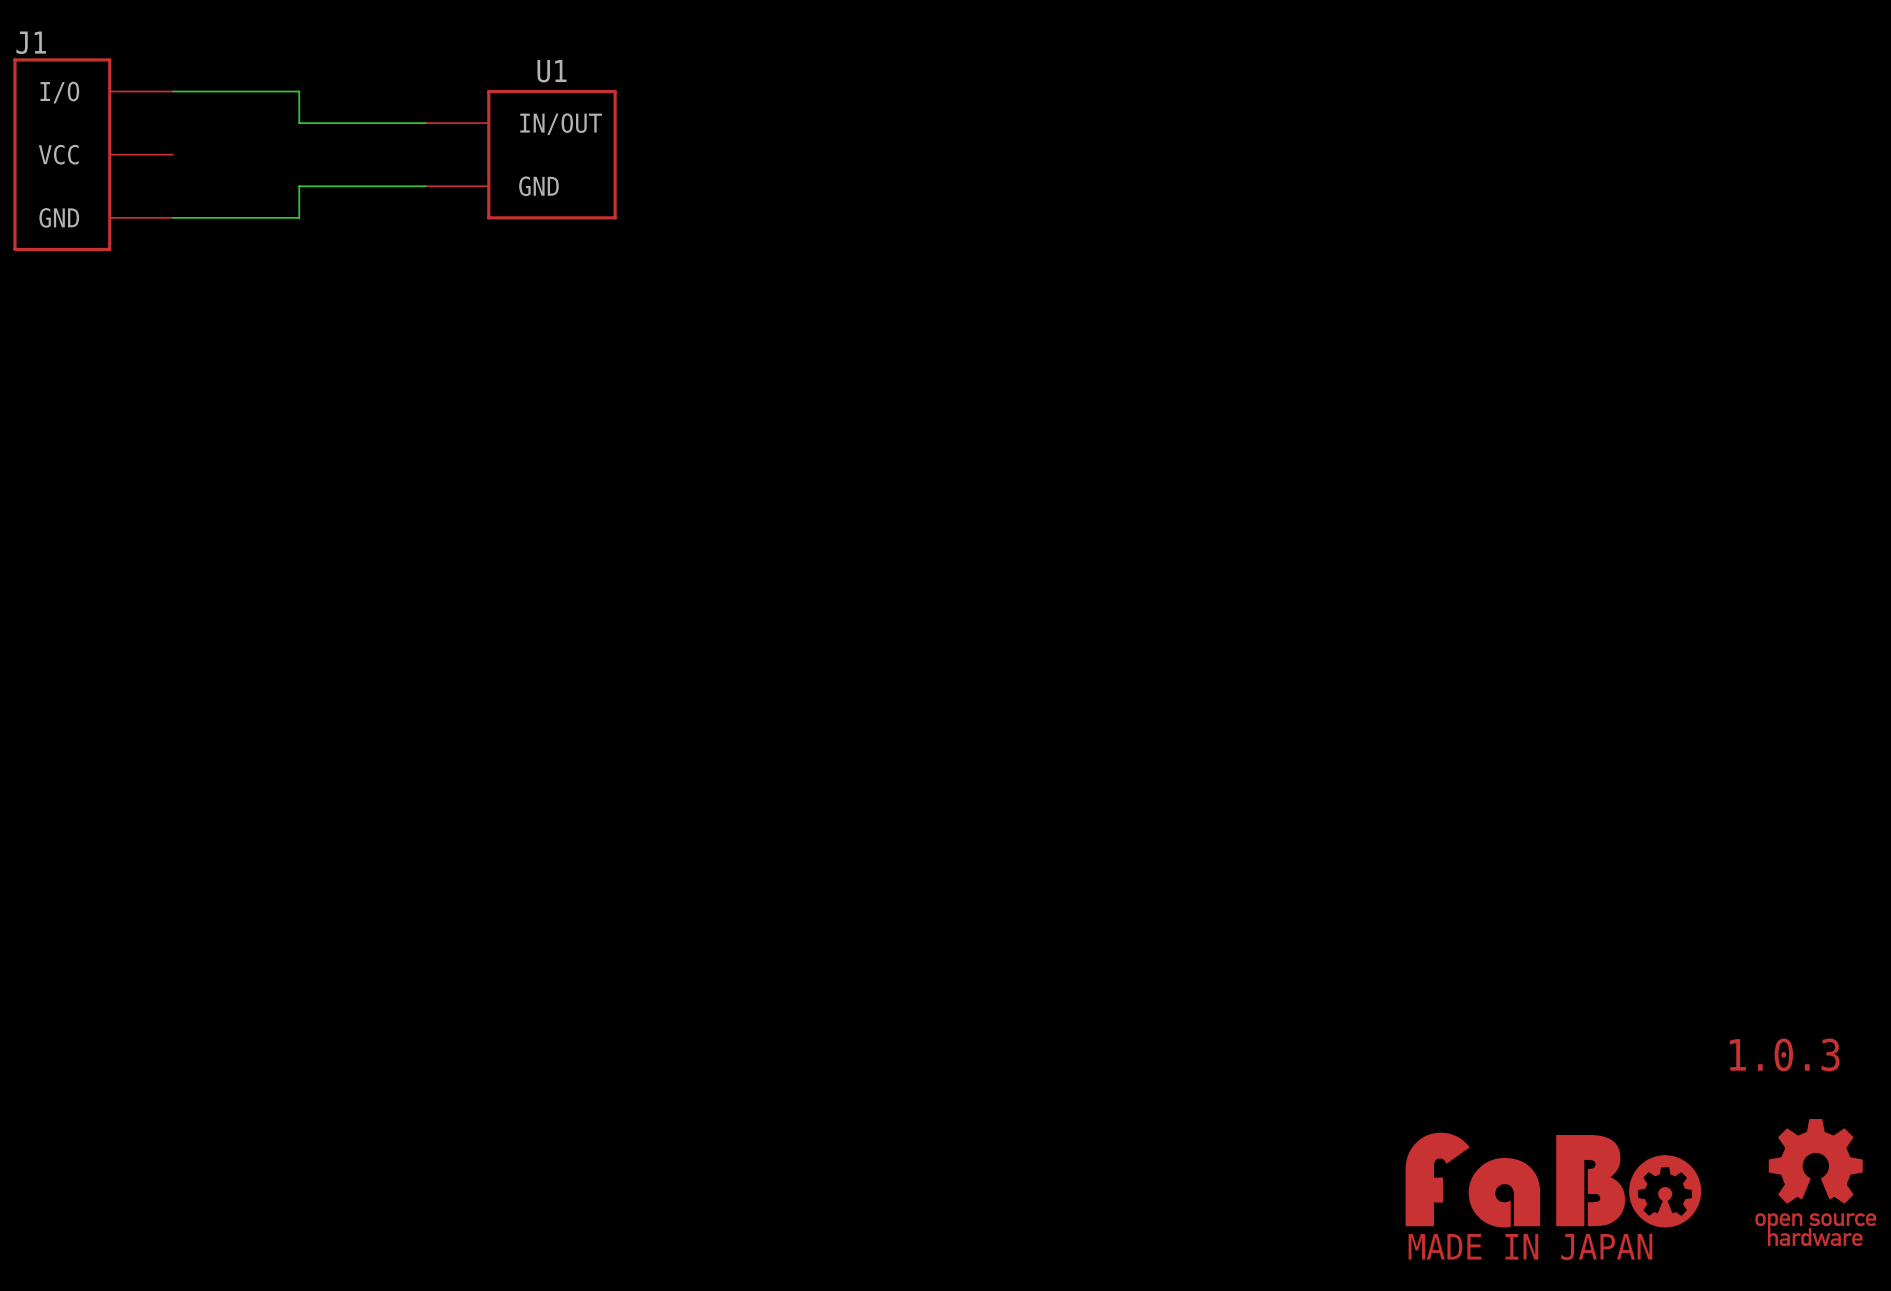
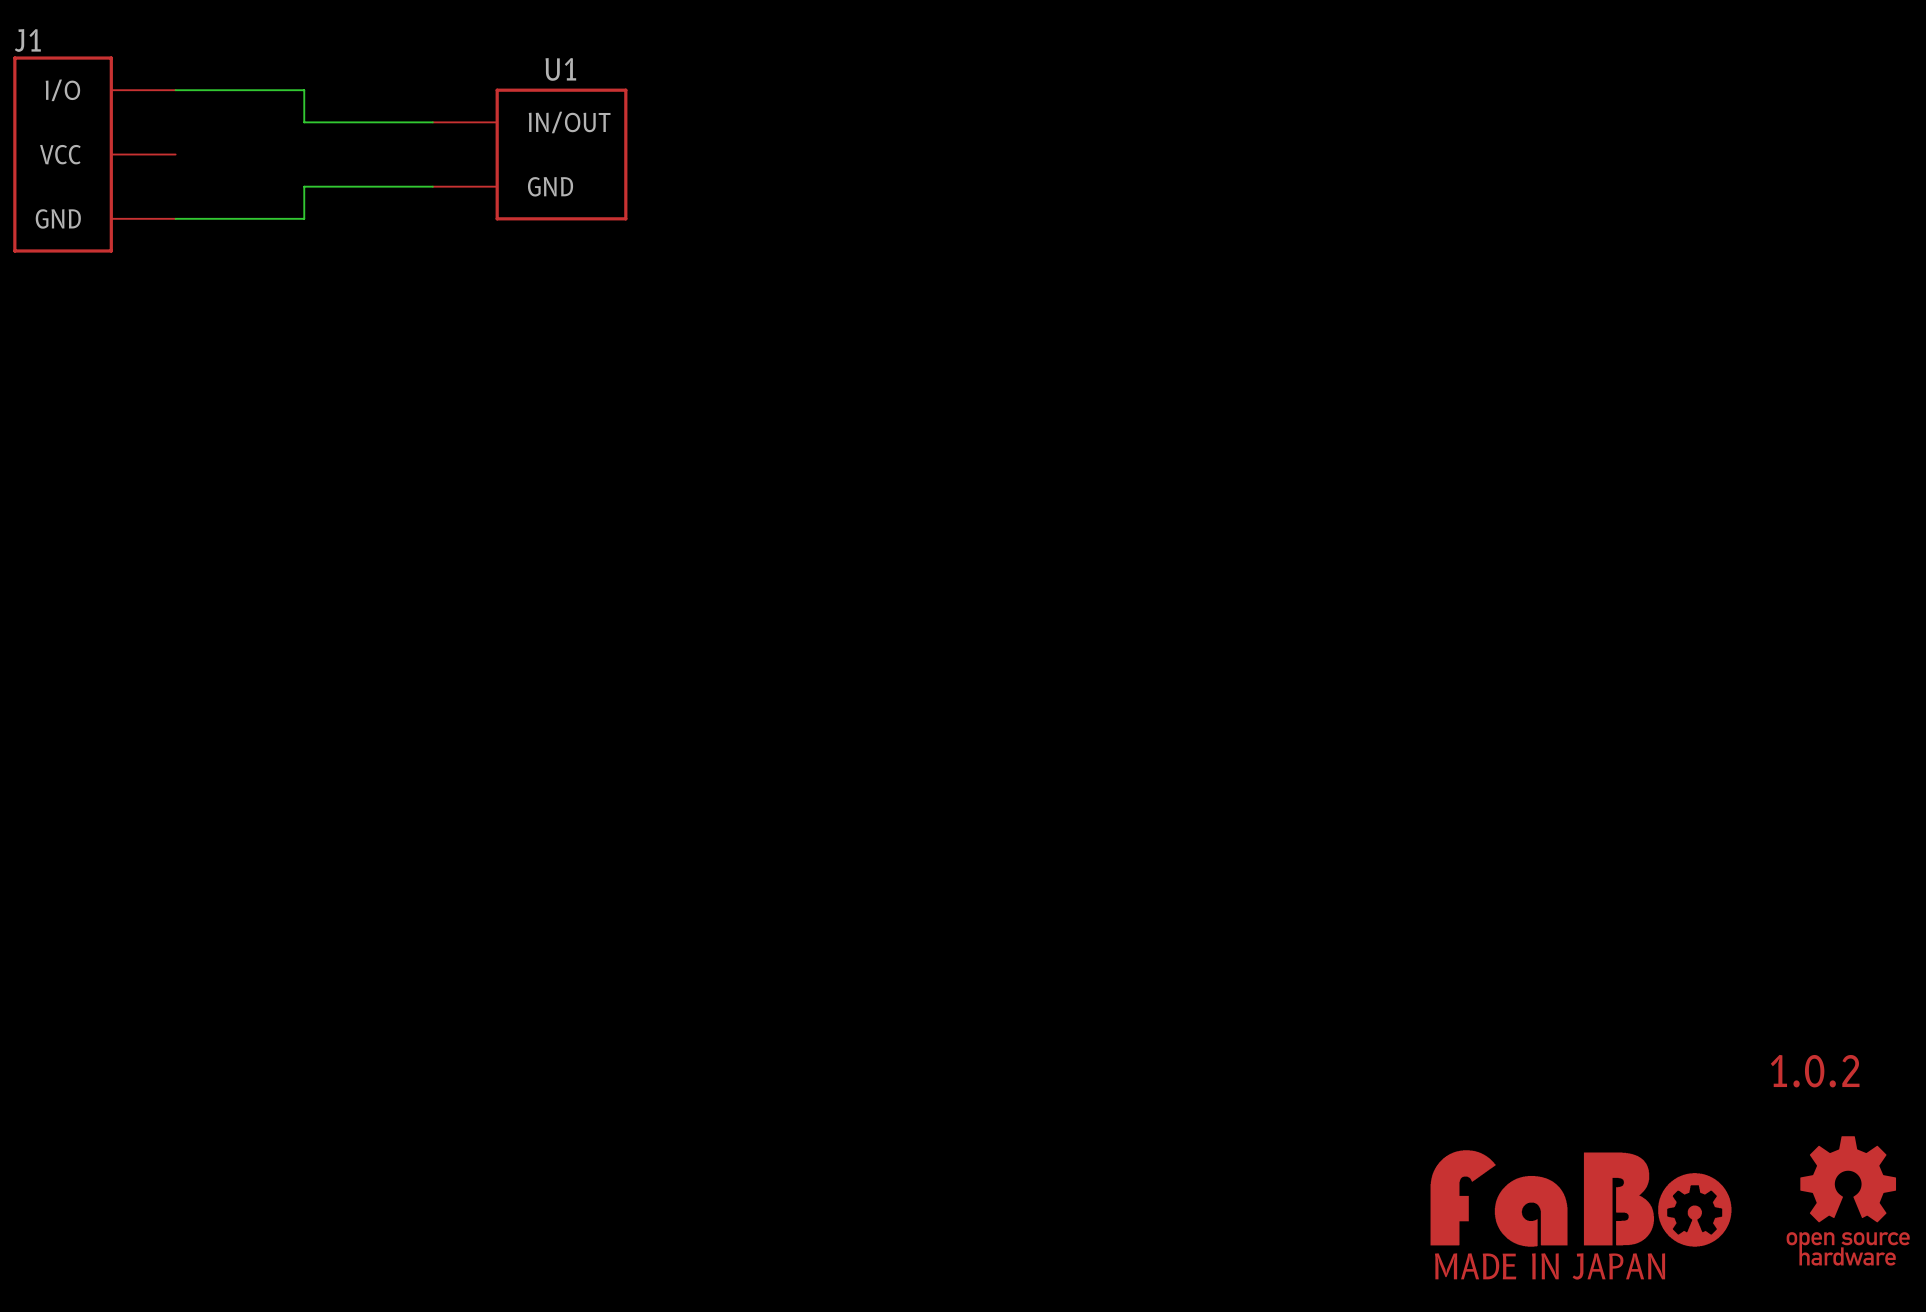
text: 1.0.3 (1784, 1054) -> 1.0.2 (1815, 1071)

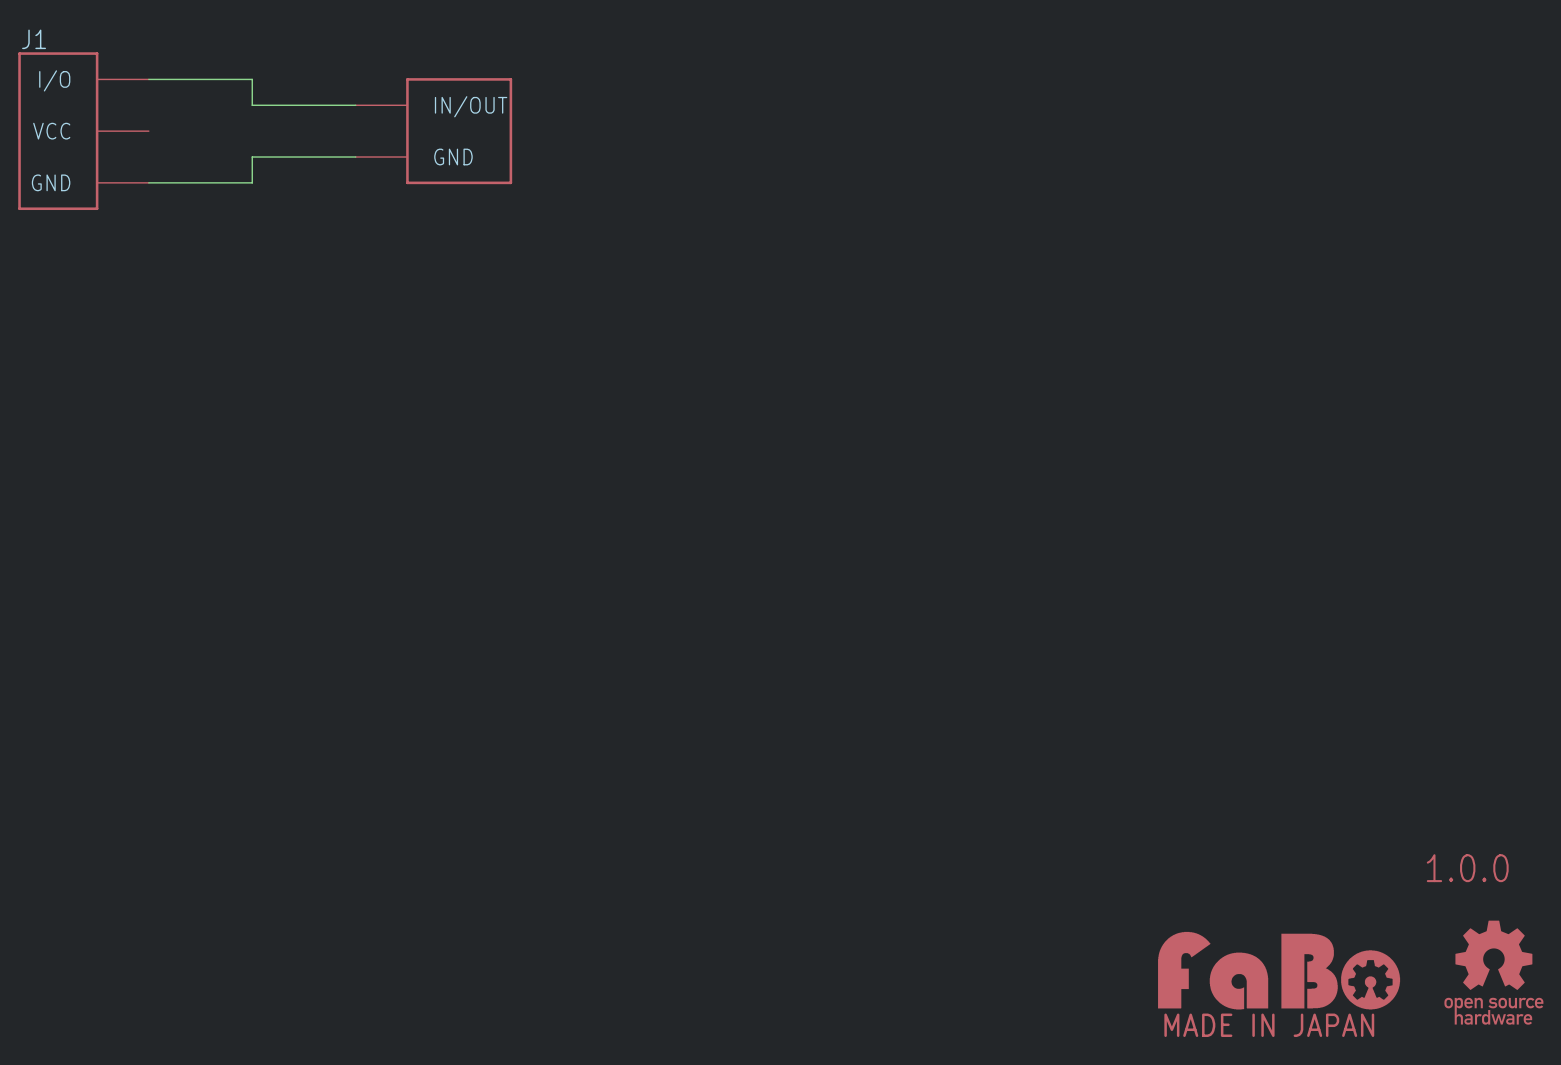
U1 name: U1 (560, 69) -> none
text: 1.0.2 (1815, 1071) -> 1.0.0 (1467, 868)

